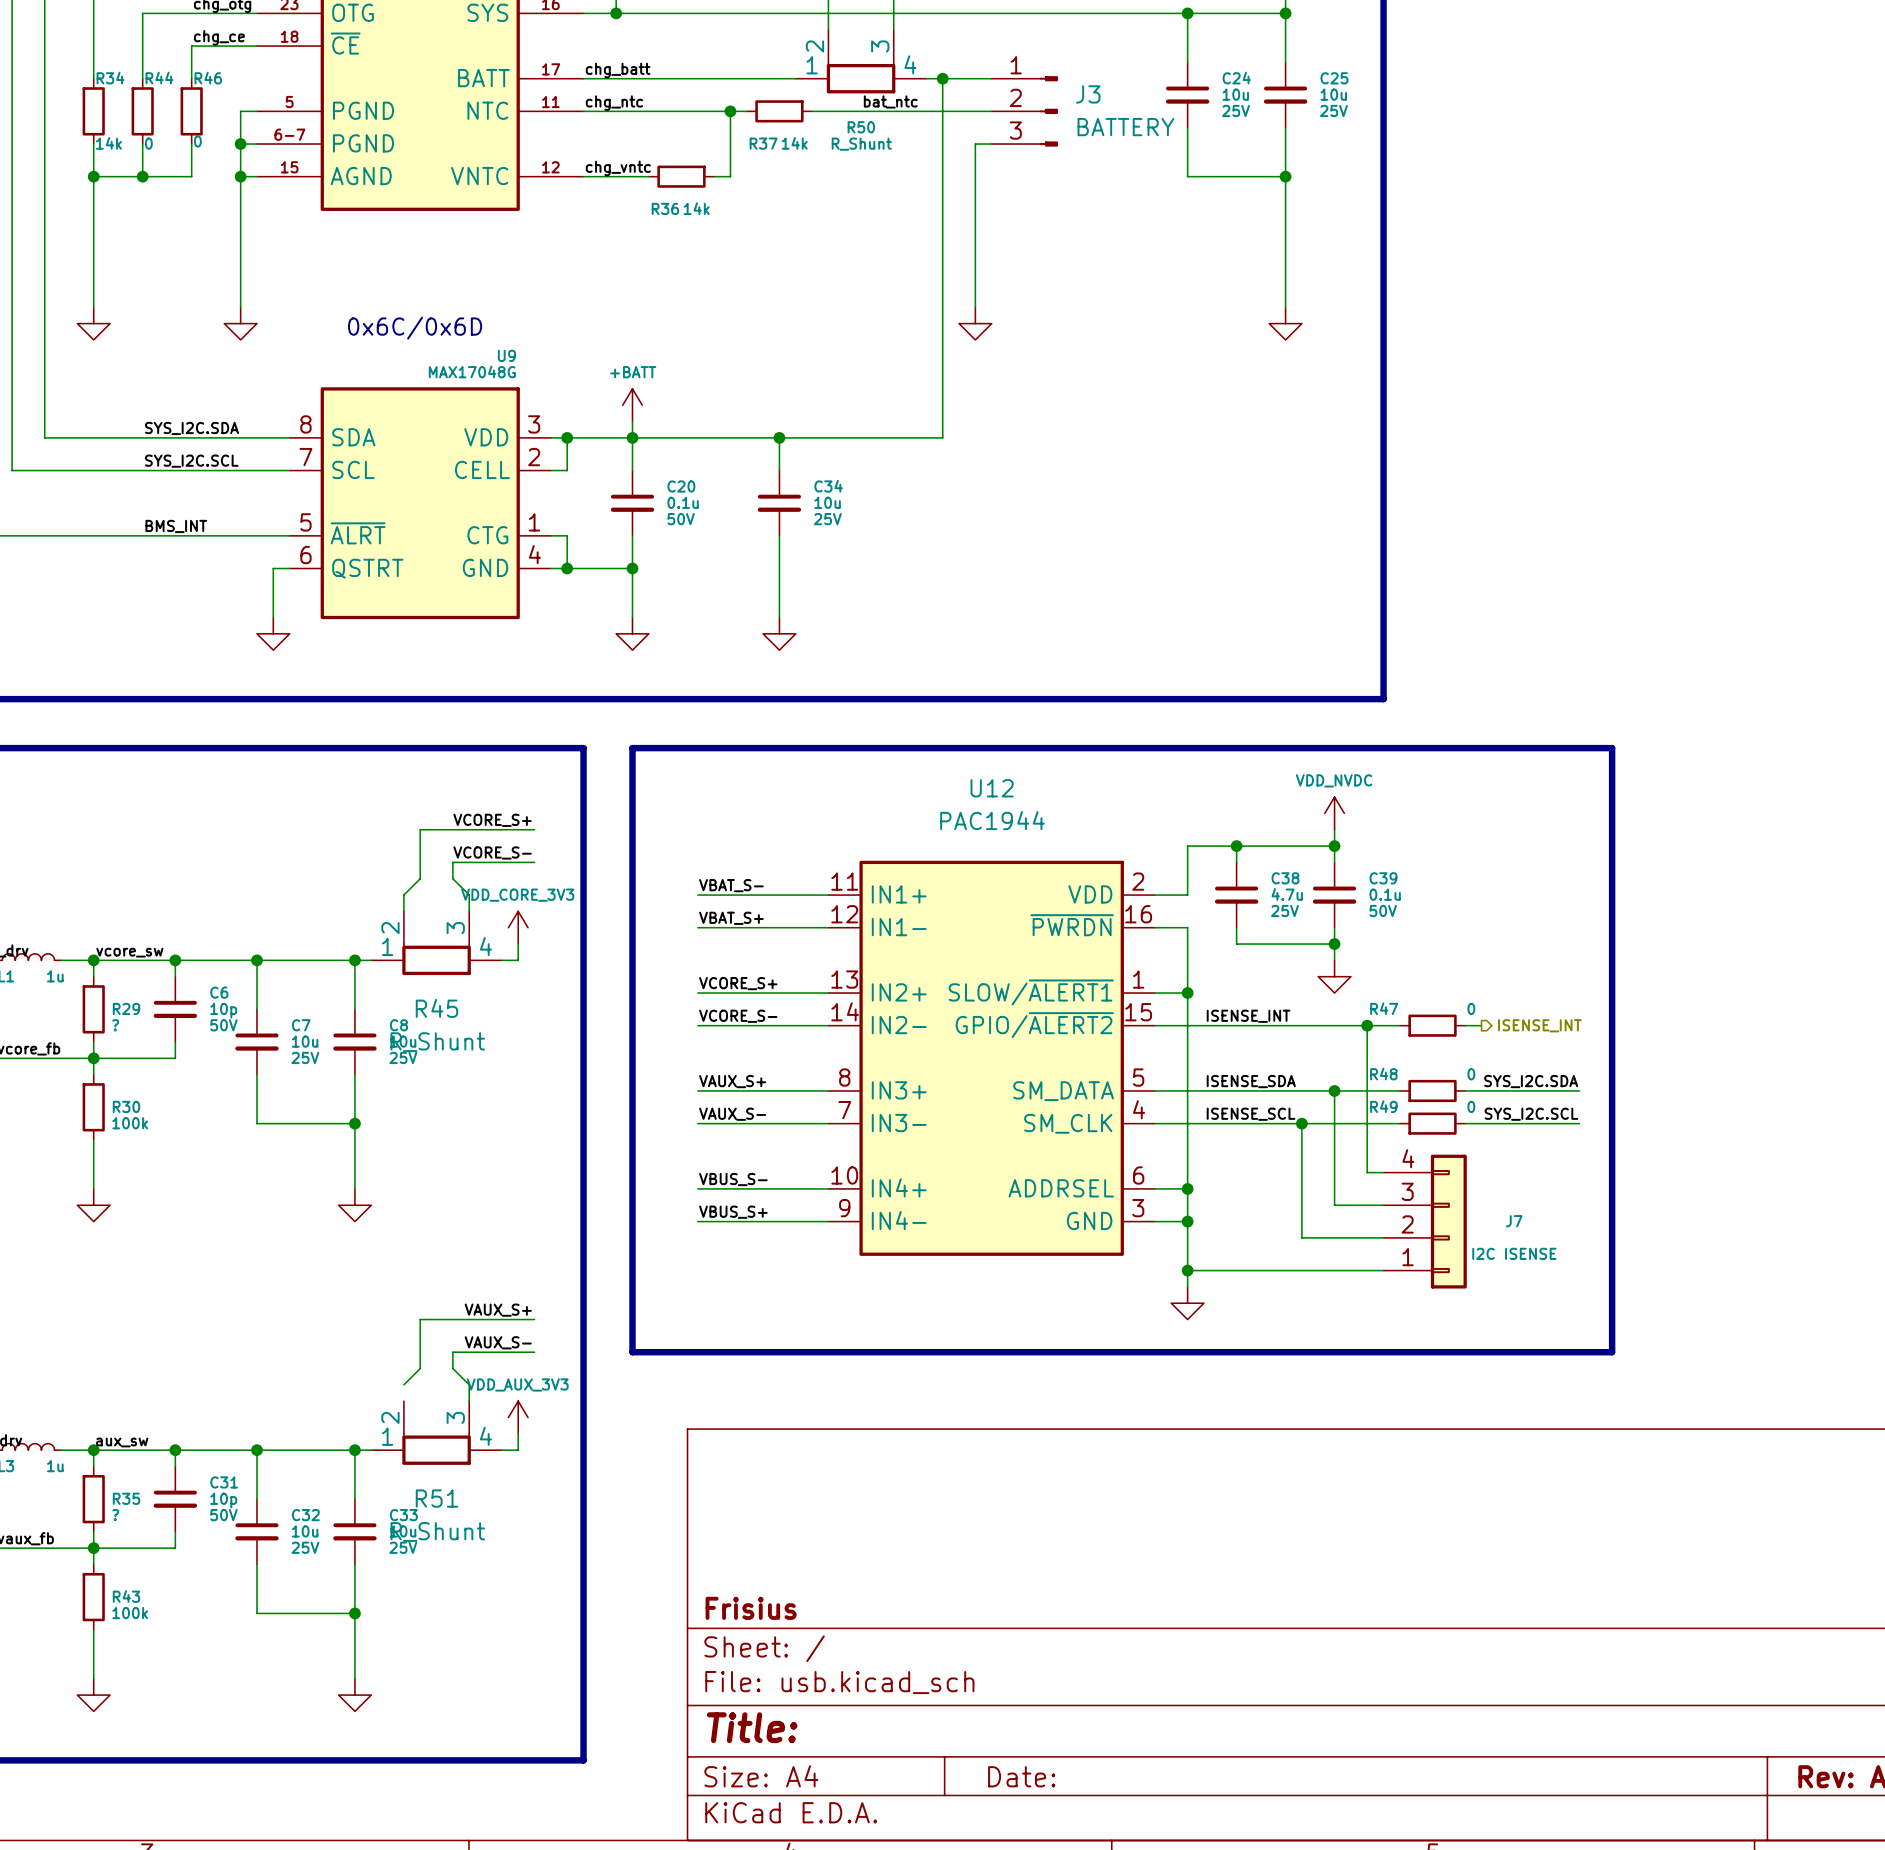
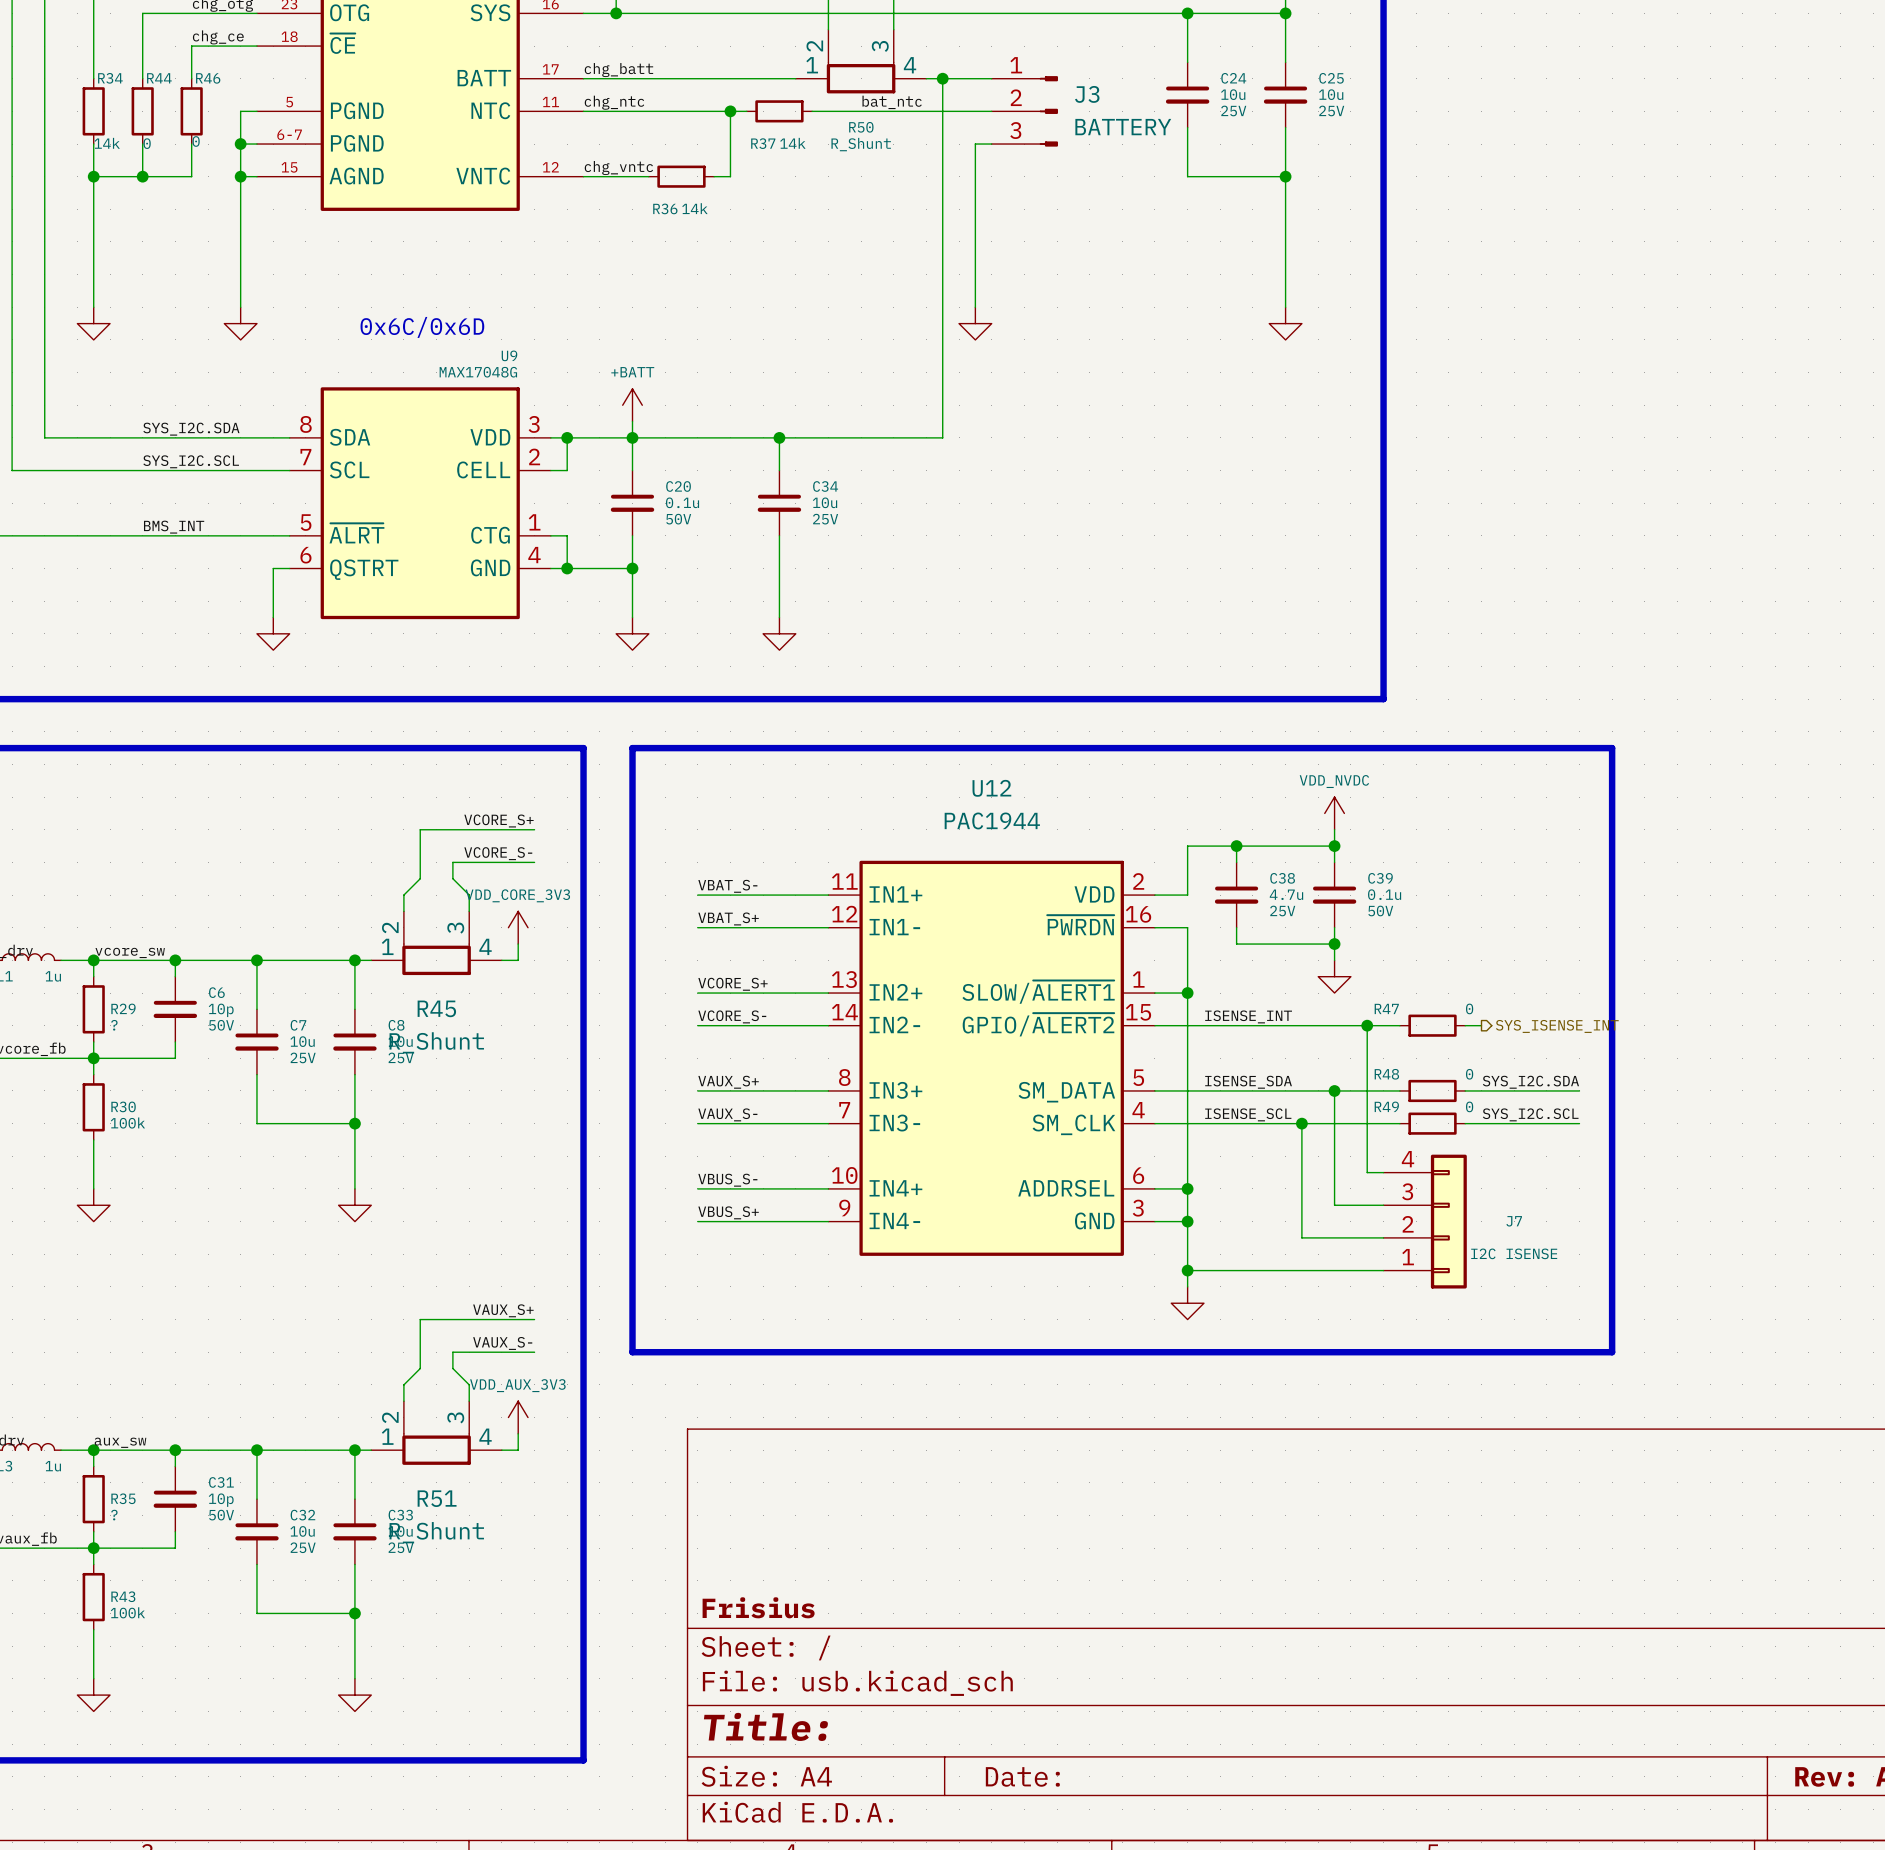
hierarchical label: ISENSE_INT (1539, 1025) -> SYS_ISENSE_INT (1557, 1026)
wire: none -> (403, 1384) (403, 1401)

